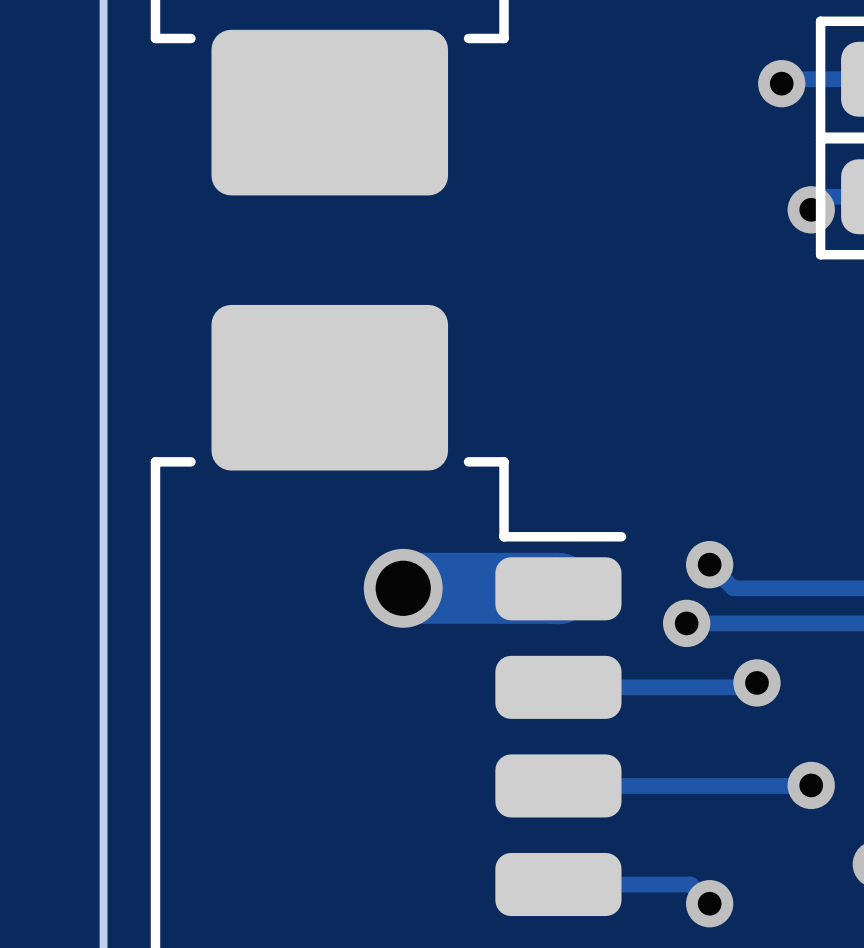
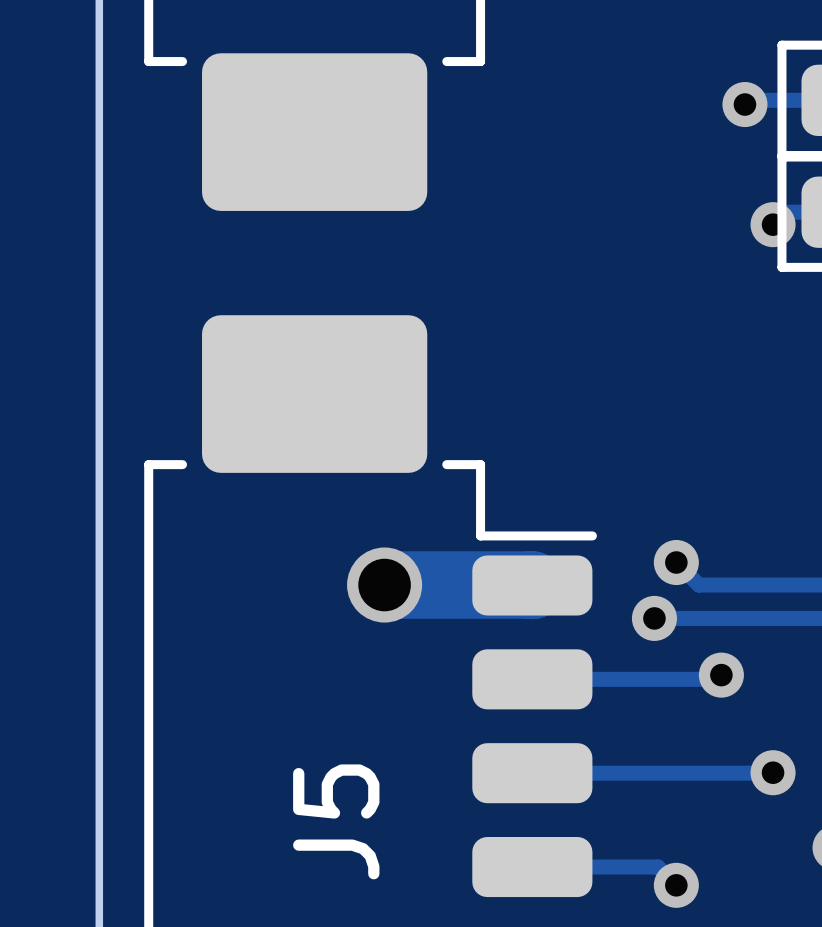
J5 name: none -> J5 (336, 821)

